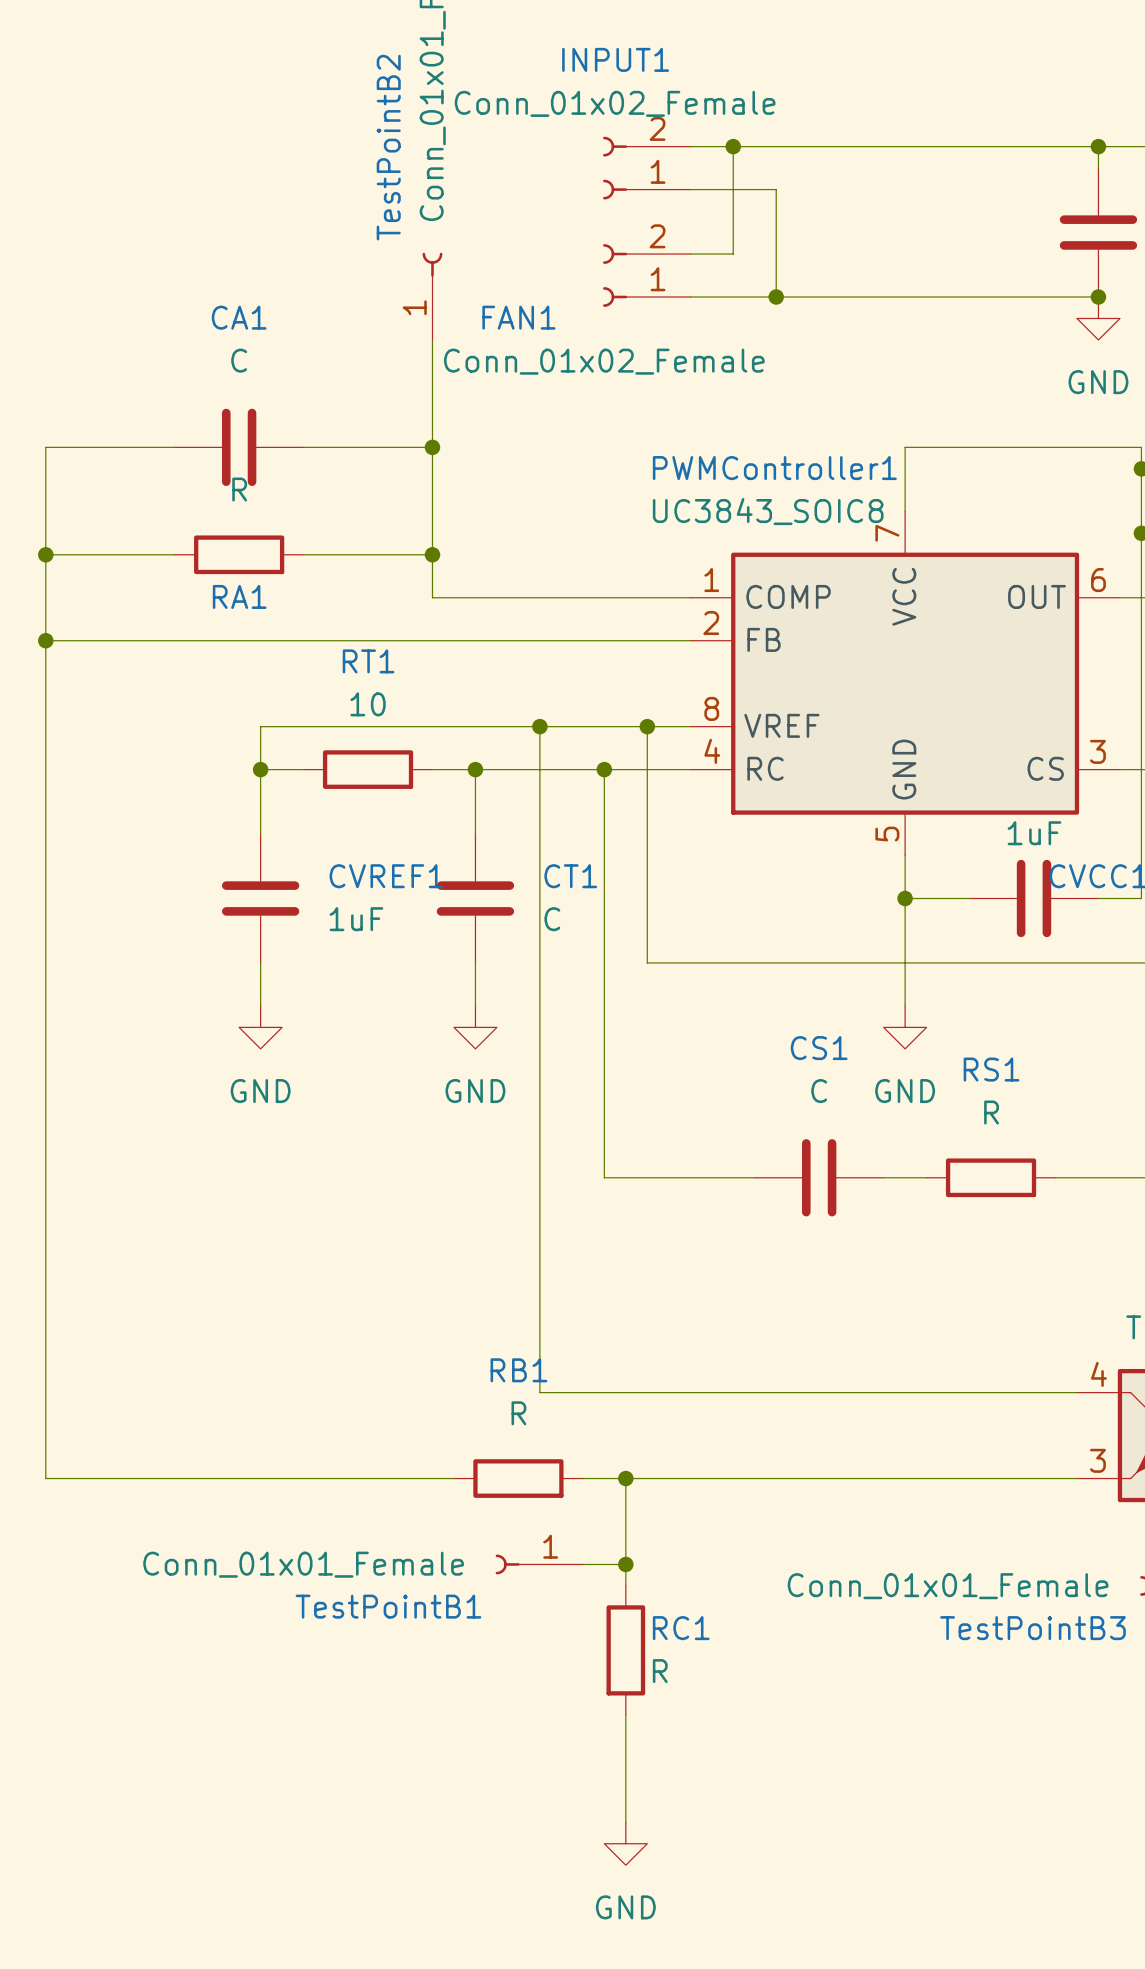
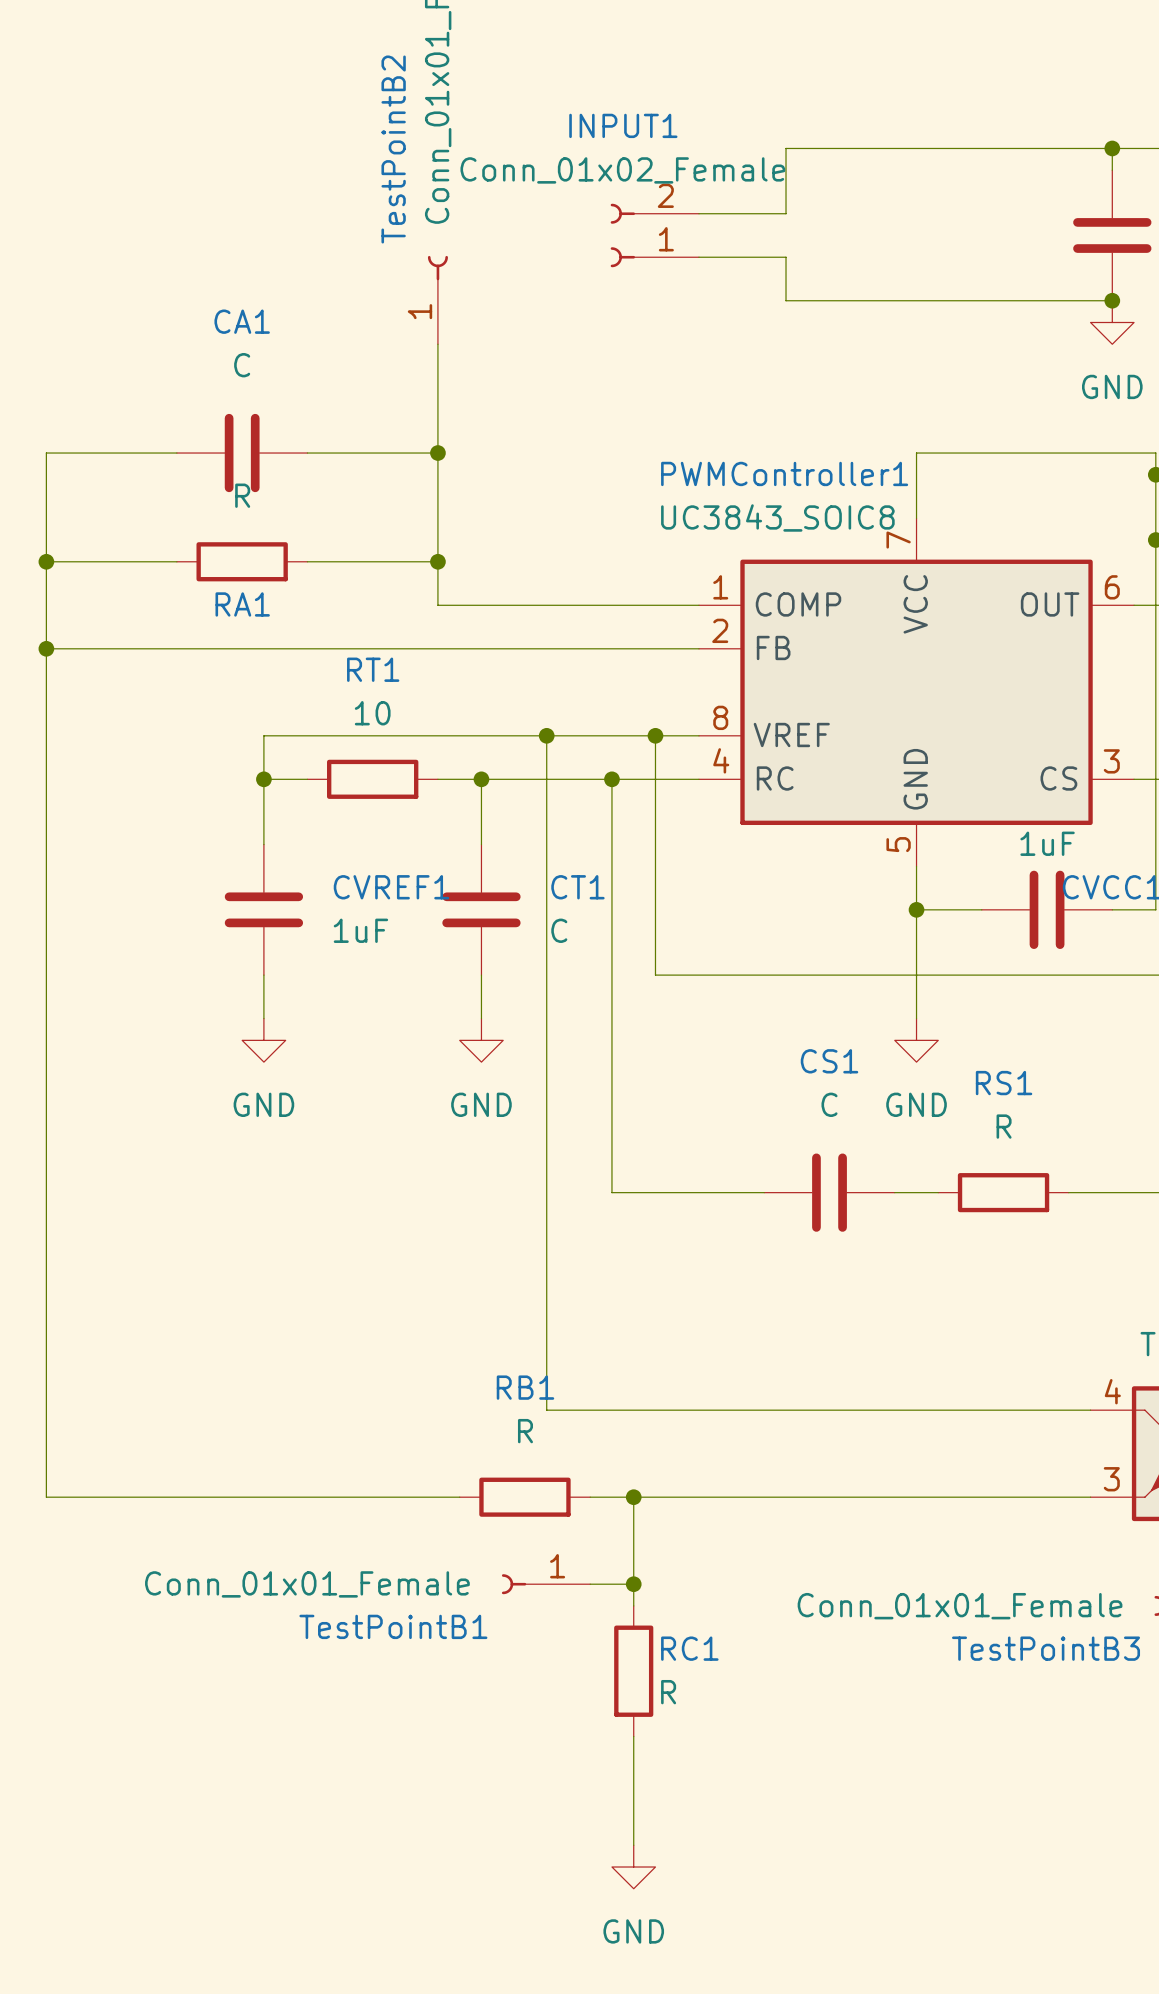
wire: (690, 146) (776, 146) -> (786, 191) (786, 148)
wire: (733, 146) (733, 254) -> none
junction: (733, 146) -> none
INPUT1 position: (646, 168) -> (654, 235)
wire: (690, 189) (776, 189) -> (698, 213) (786, 213)
wire: (776, 211) (776, 254) -> (742, 257) (786, 257)
FAN1: Conn_01x02_Female (646, 275) -> none
wire: (690, 296) (776, 296) -> none
junction: (776, 296) -> none

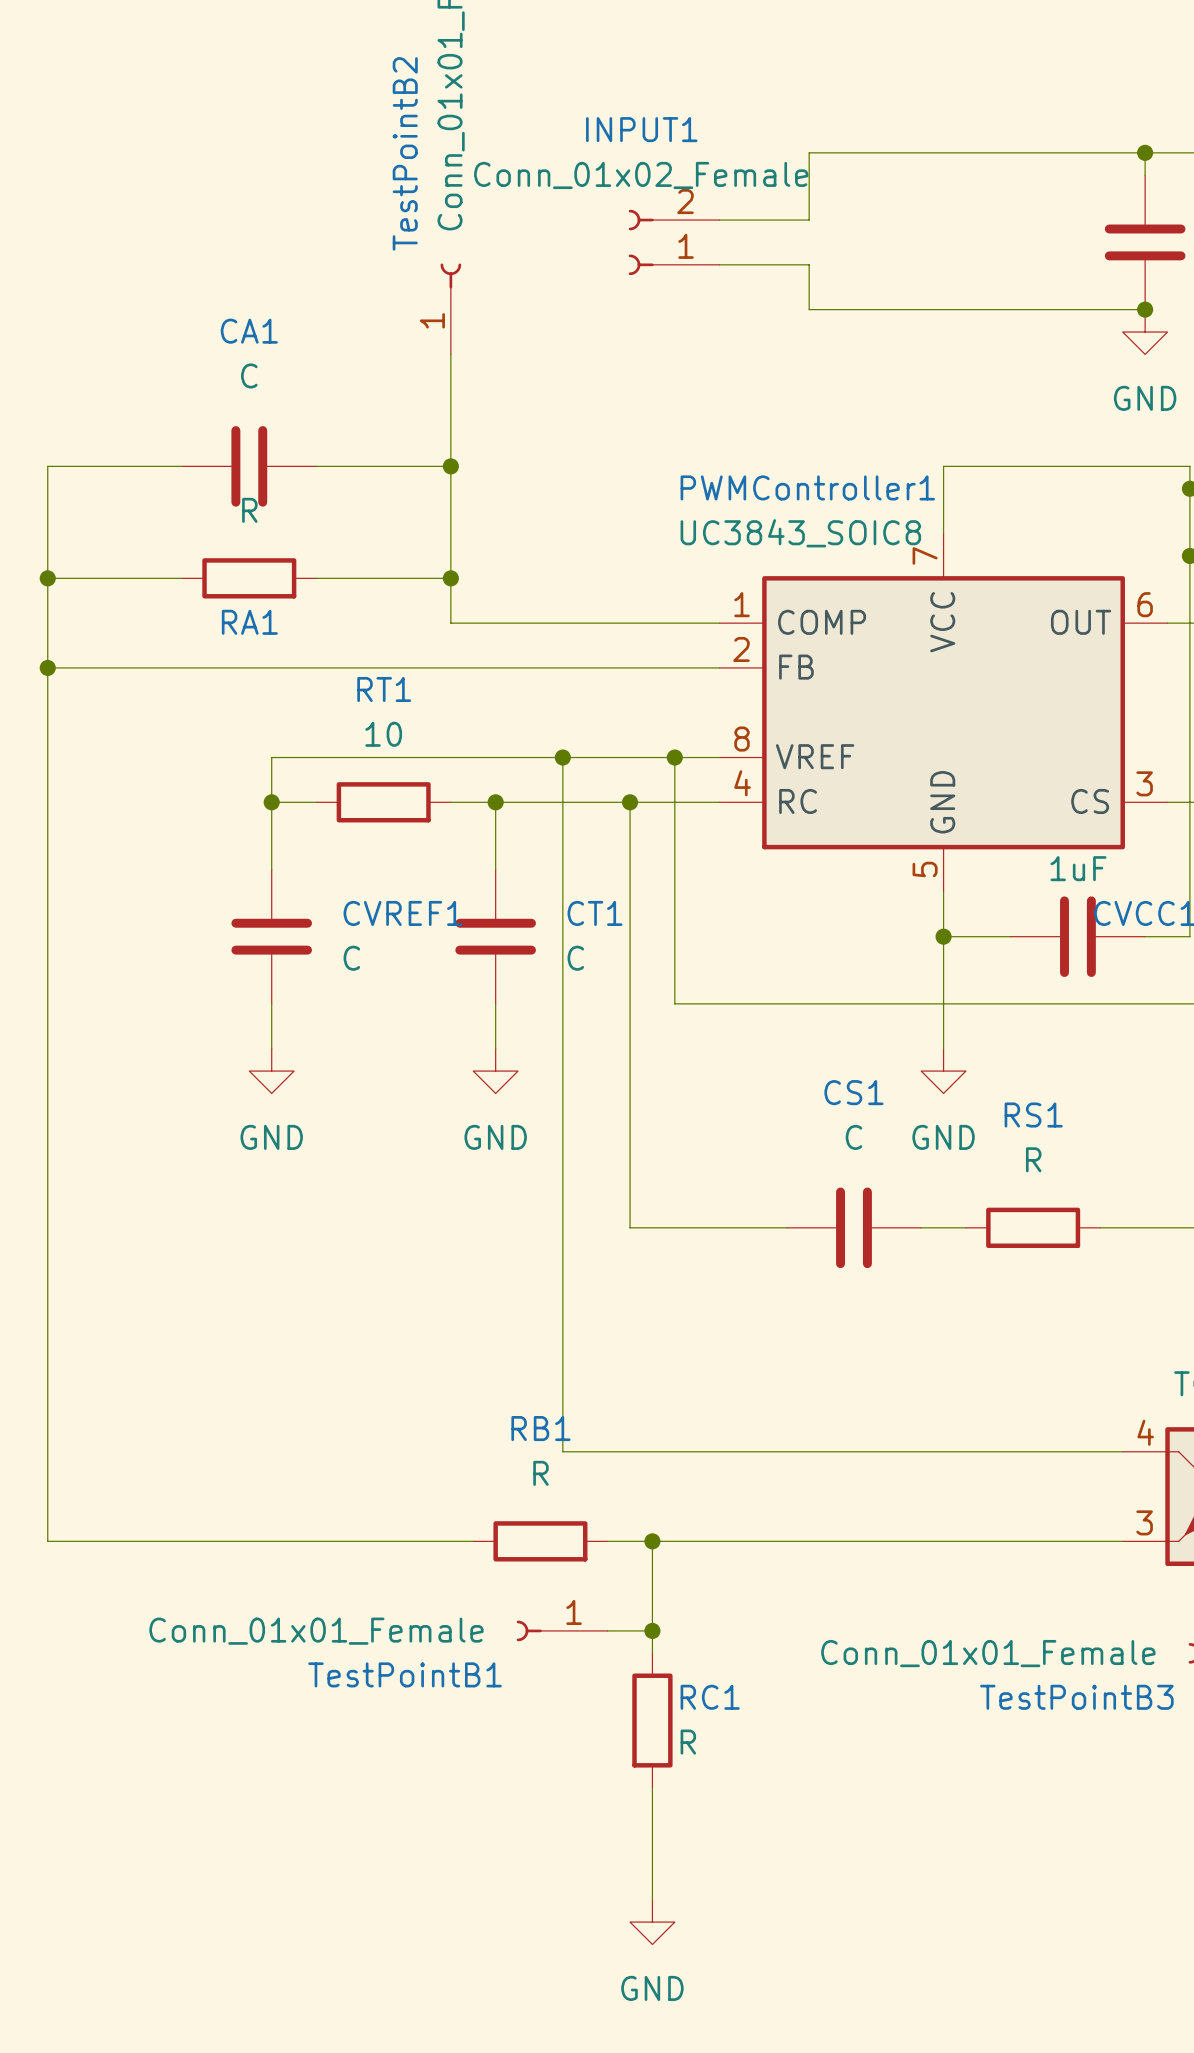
CVREF1 value: 1uF (360, 930) -> C (351, 958)

